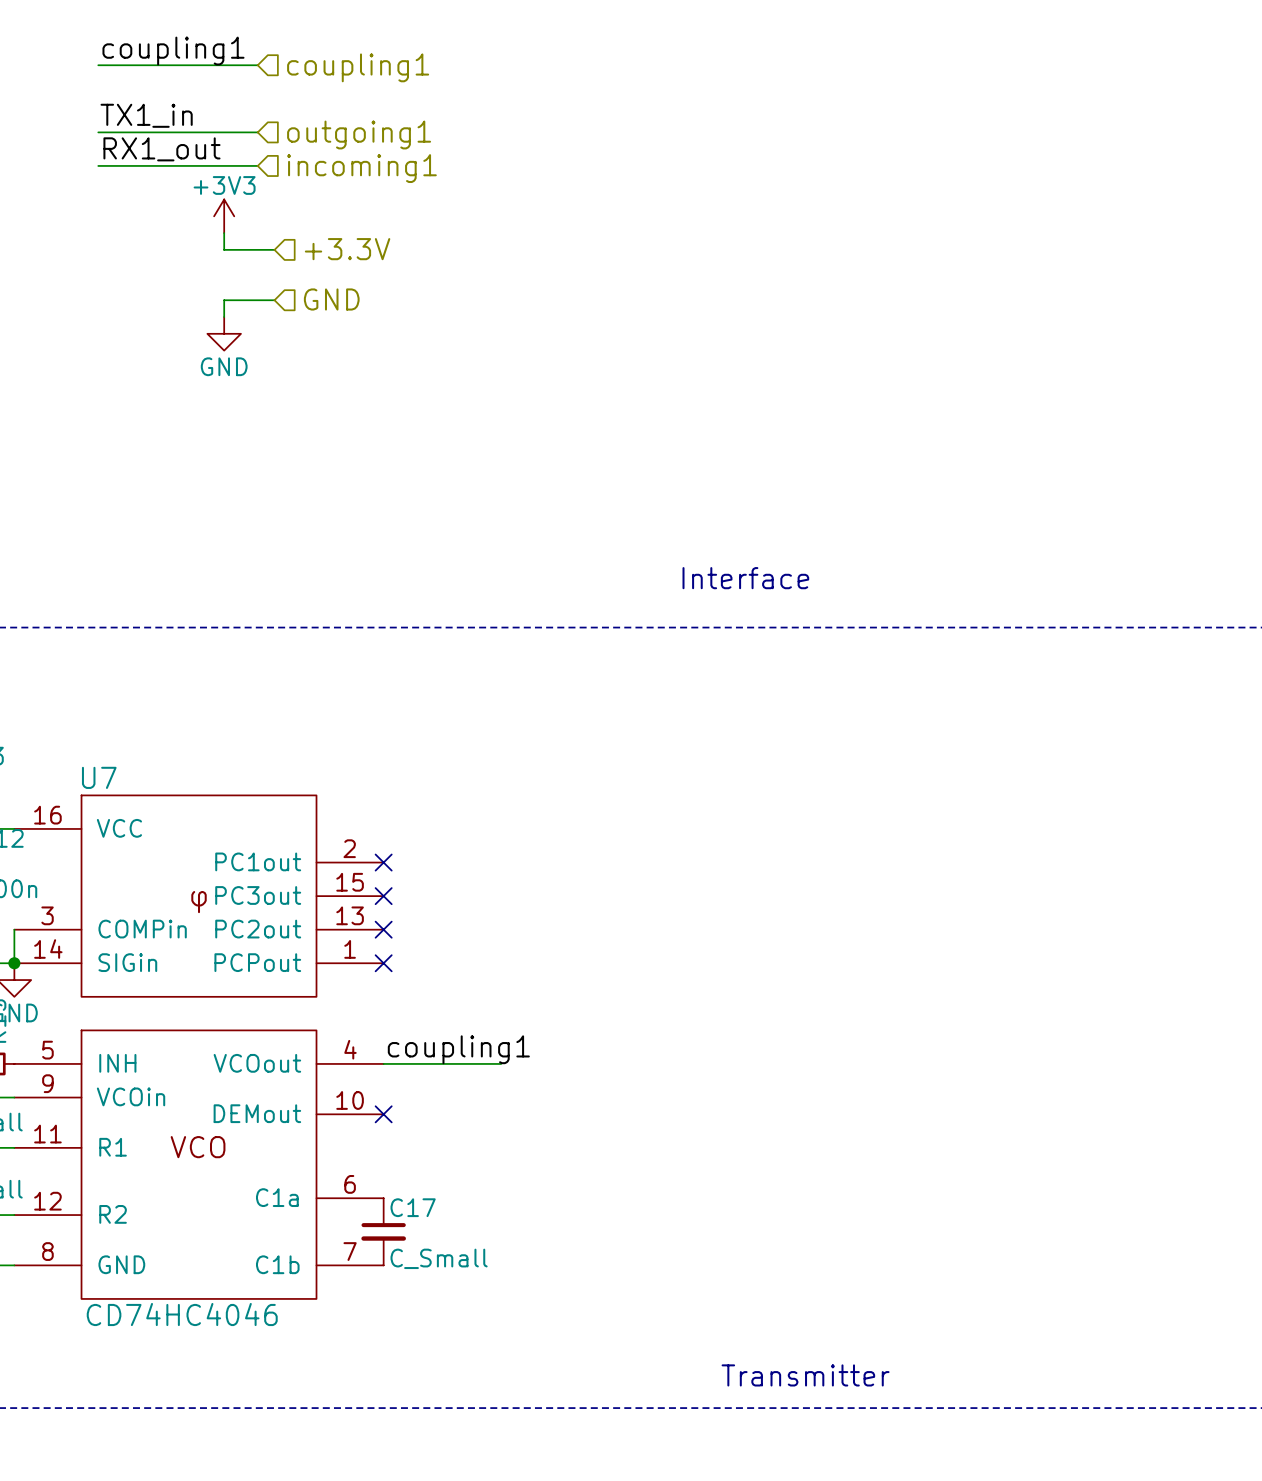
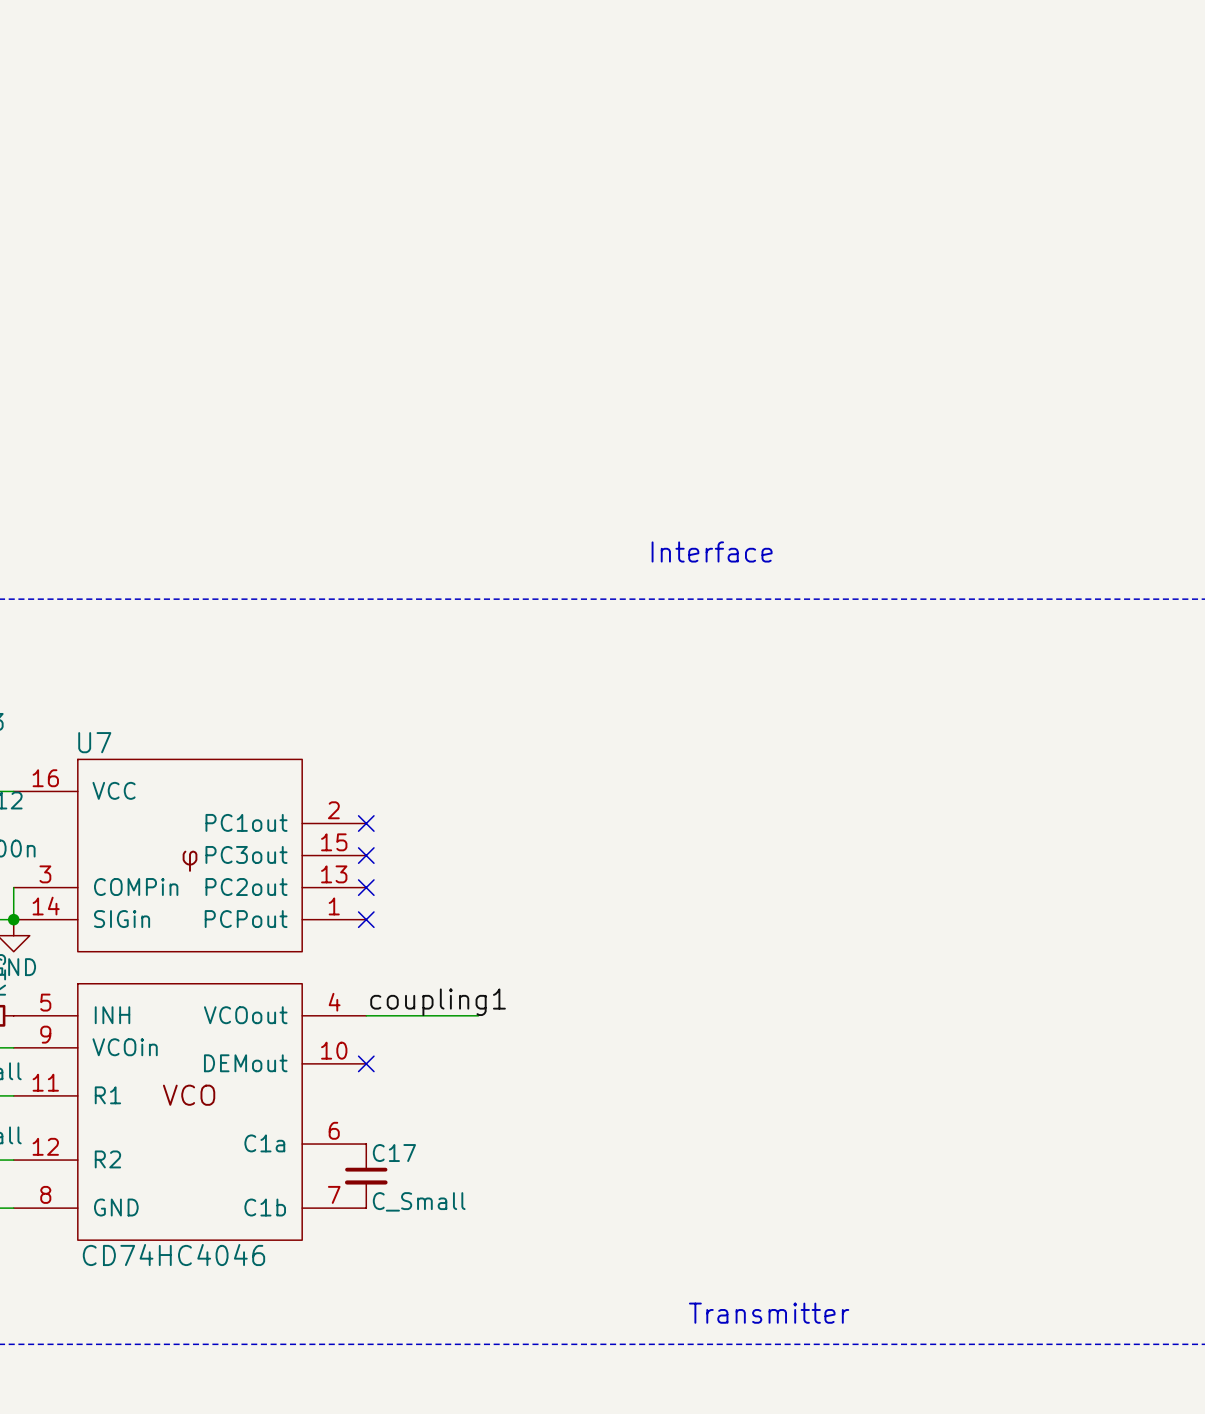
label: coupling1 (173, 51) -> none
wire: (98, 65) (257, 65) -> none
hierarchical label: coupling1 (358, 67) -> none
label: TX1_in (146, 115) -> none
wire: (98, 132) (257, 132) -> none
hierarchical label: outgoing1 (359, 135) -> none
label: RX1_out (161, 149) -> none
wire: (98, 165) (257, 165) -> none
hierarchical label: incoming1 (361, 168) -> none
power symbol: +3V3 (224, 216) -> none
wire: (224, 233) (224, 249) (274, 249) -> none
hierarchical label: +3.3V (347, 249) -> none
hierarchical label: GND (331, 299) -> none
wire: (274, 300) (224, 300) (224, 317) -> none
power symbol: GND (224, 333) -> none

